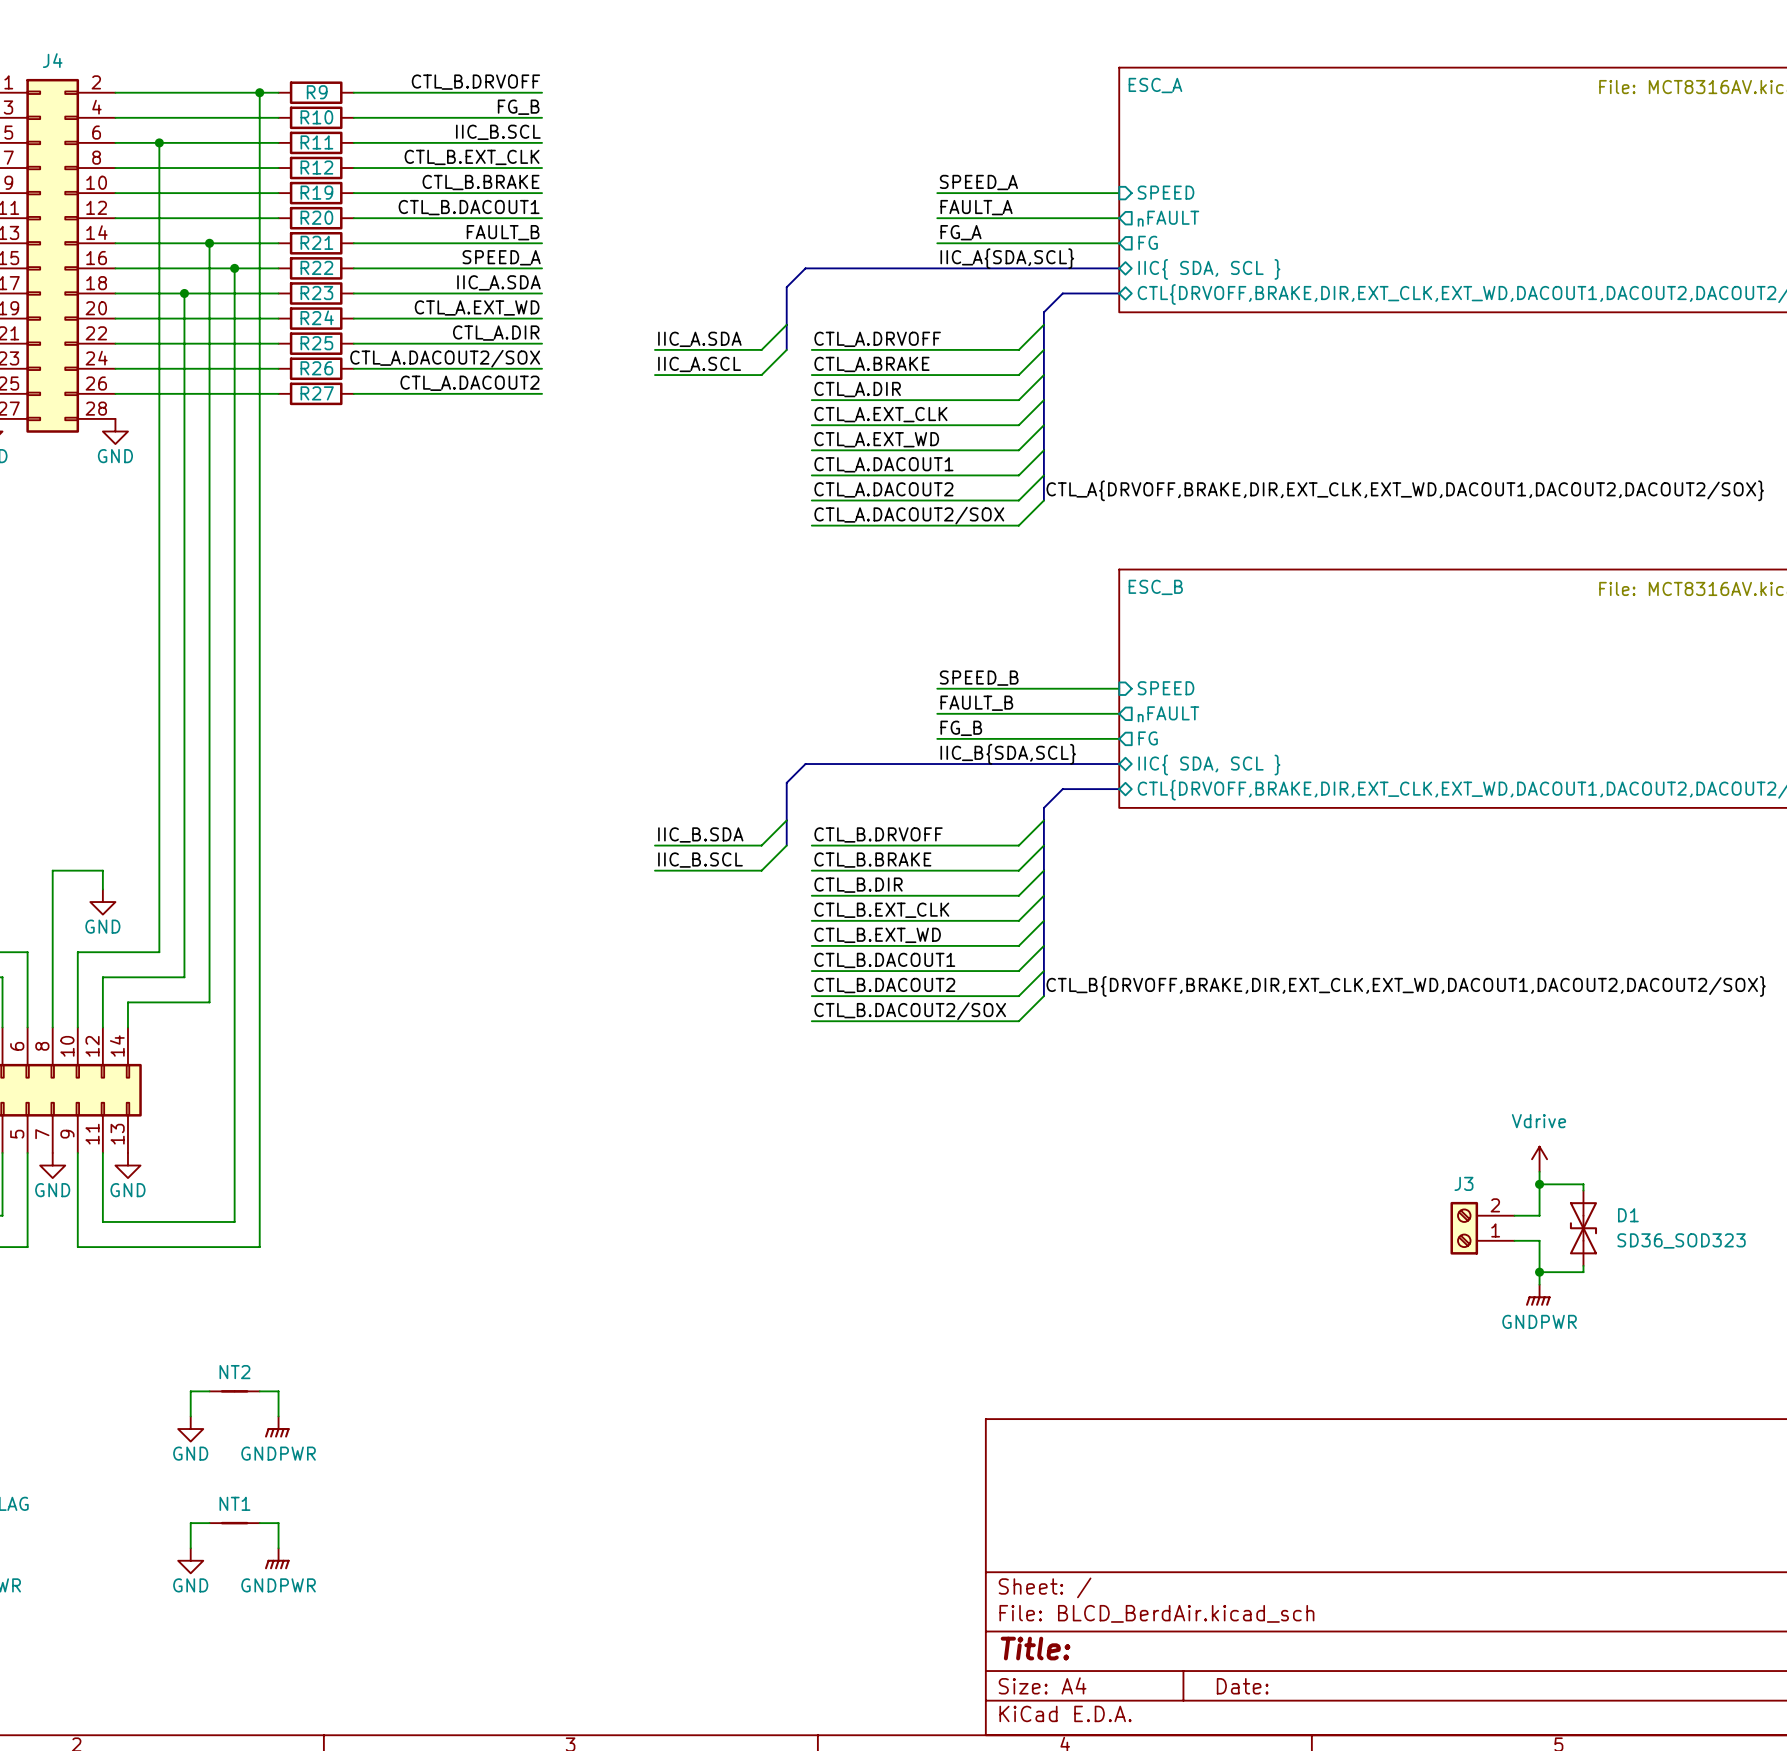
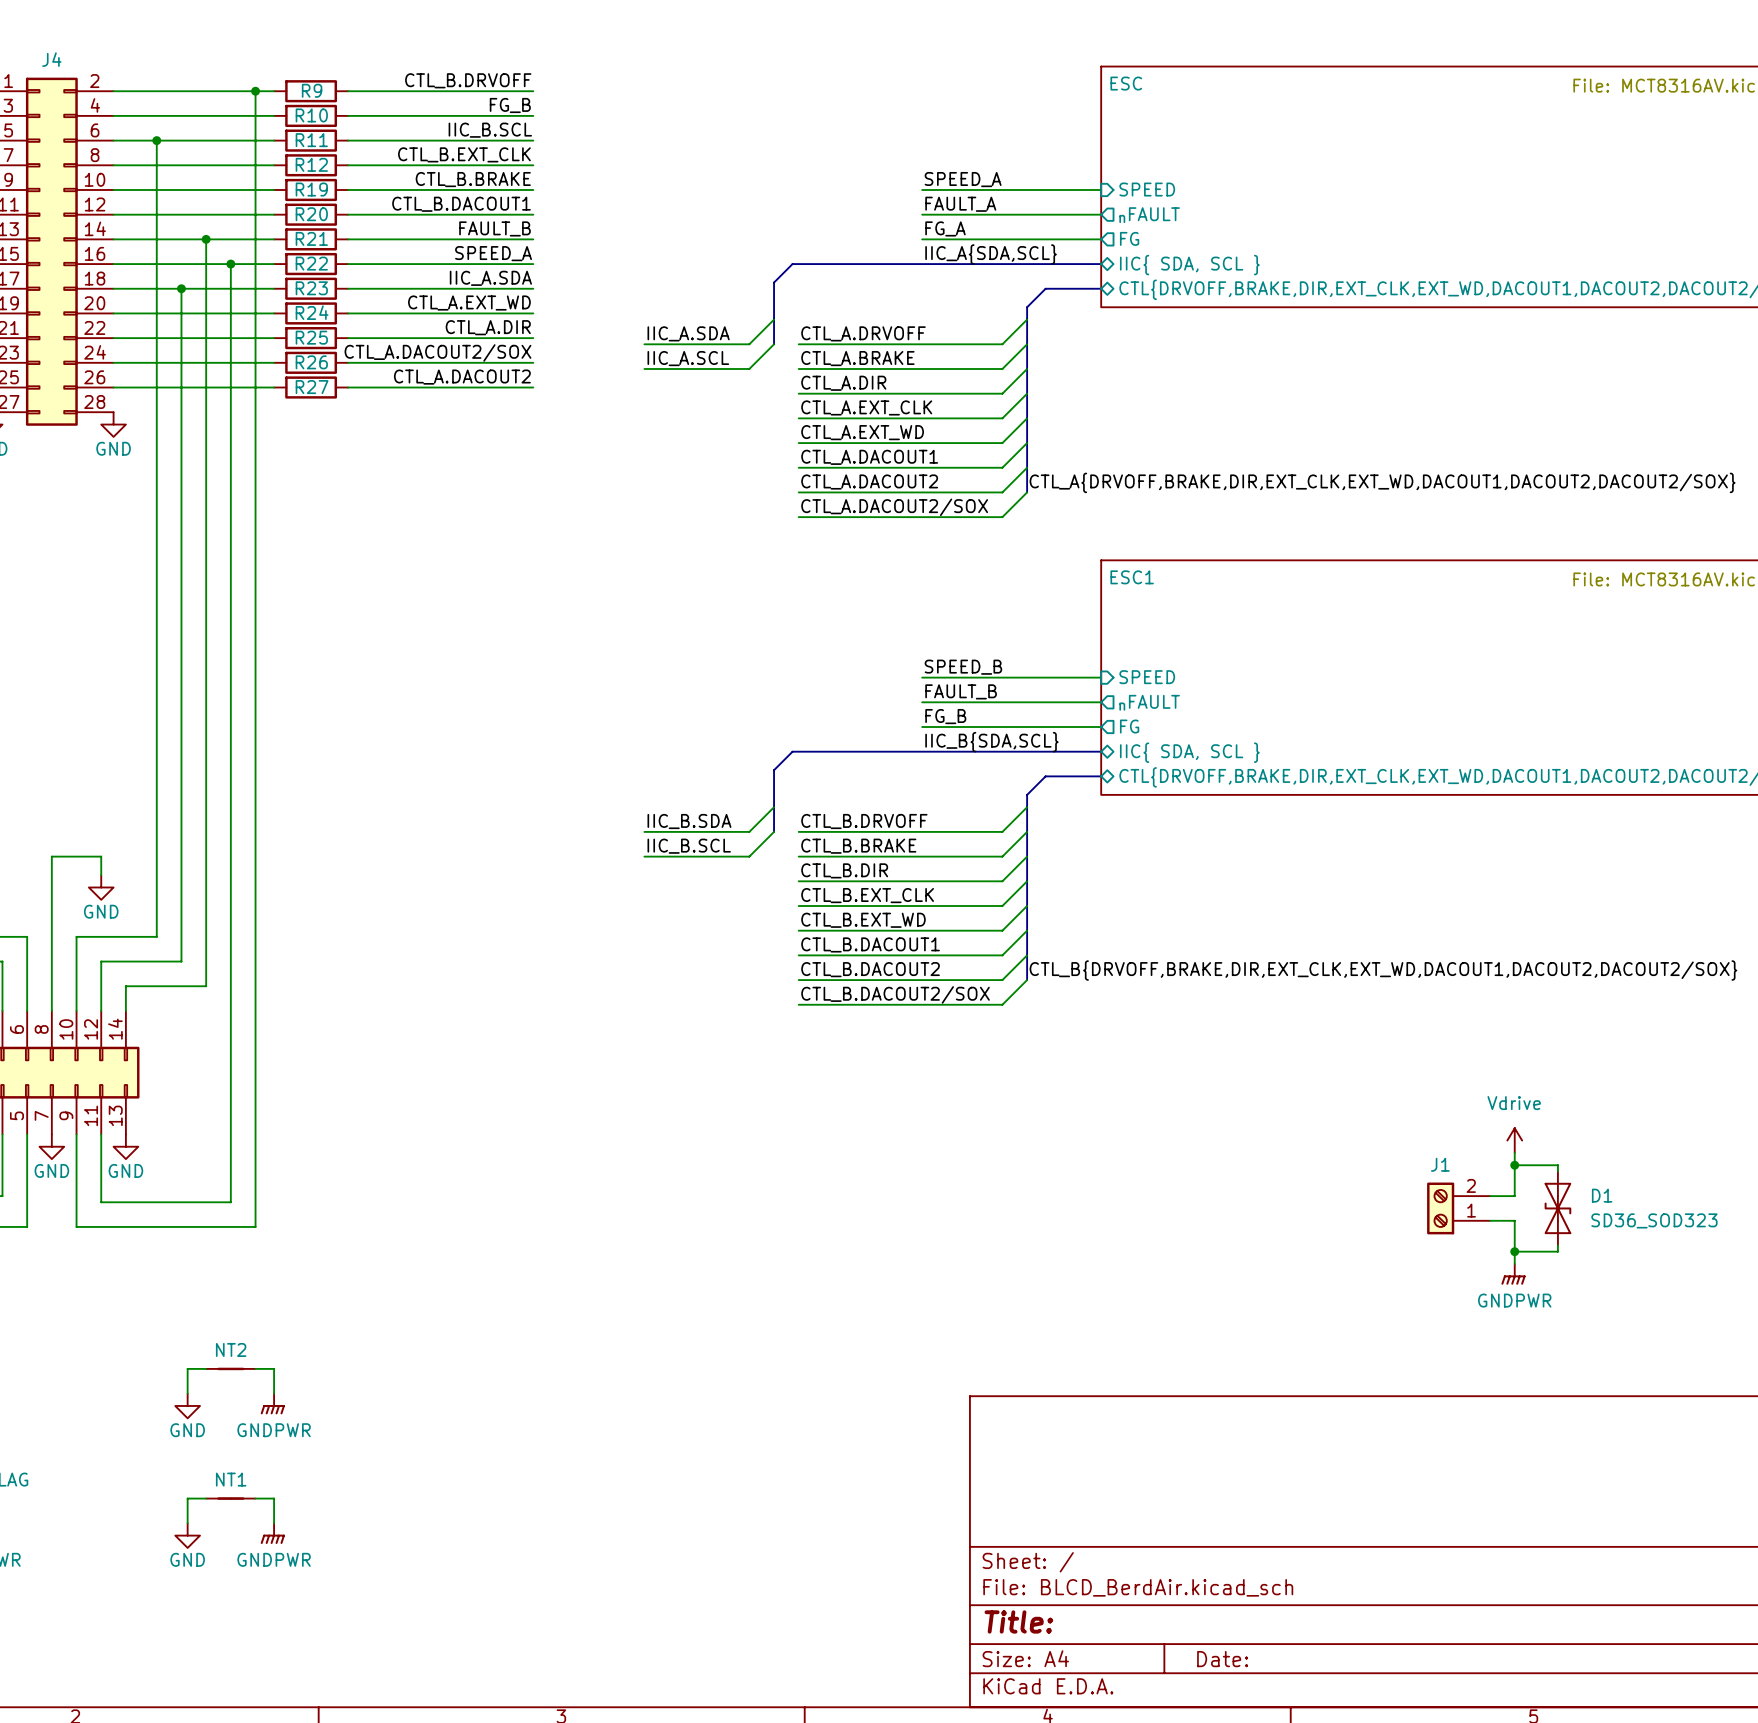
sheet ESC_A name: ESC_A (1155, 85) -> ESC (1126, 83)
sheet ESC_B name: ESC_B (1155, 587) -> ESC1 (1132, 577)
J3 name: J3 (1463, 1183) -> J1 (1440, 1164)

